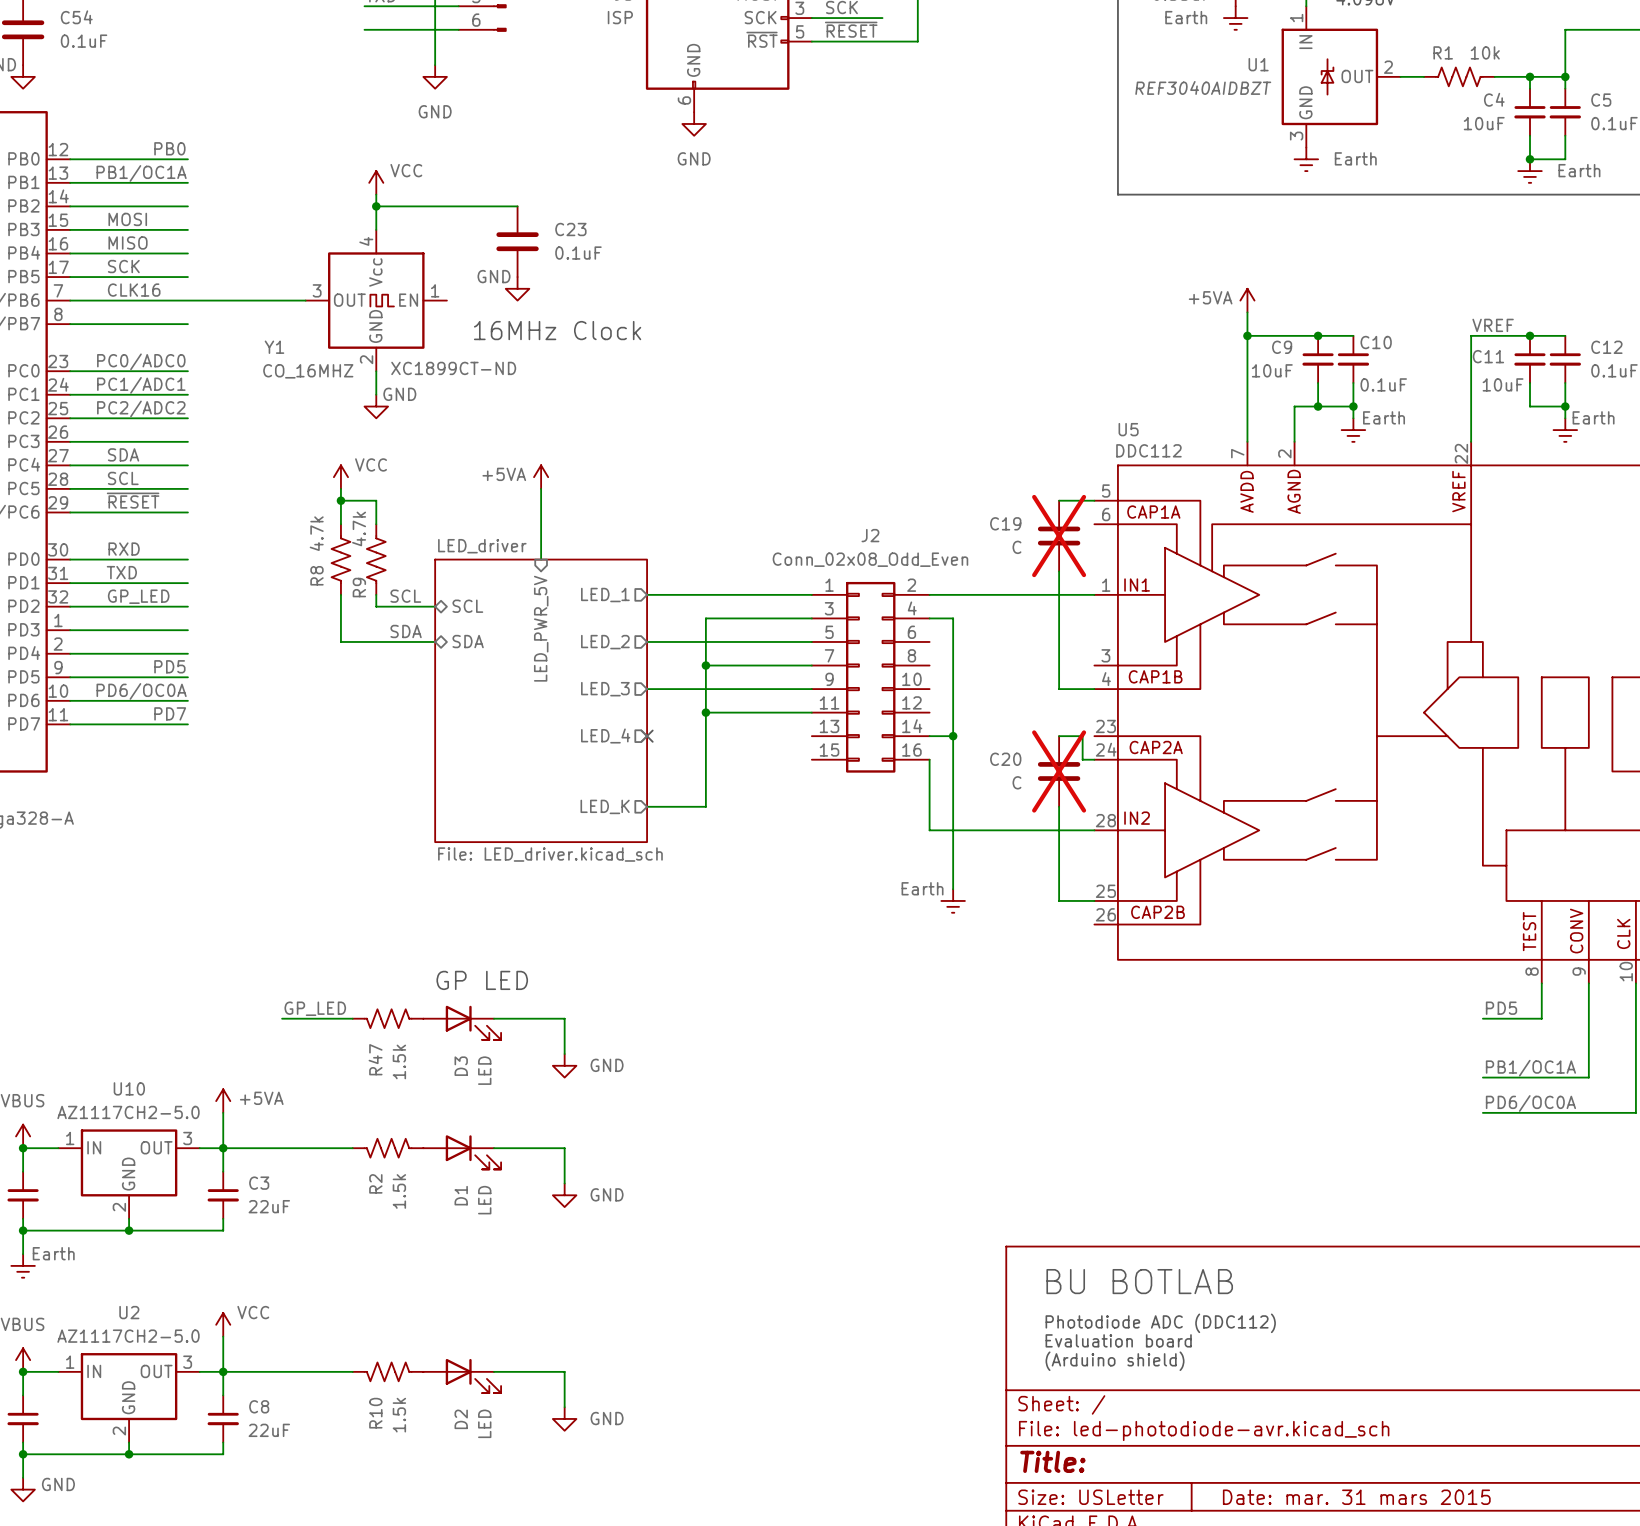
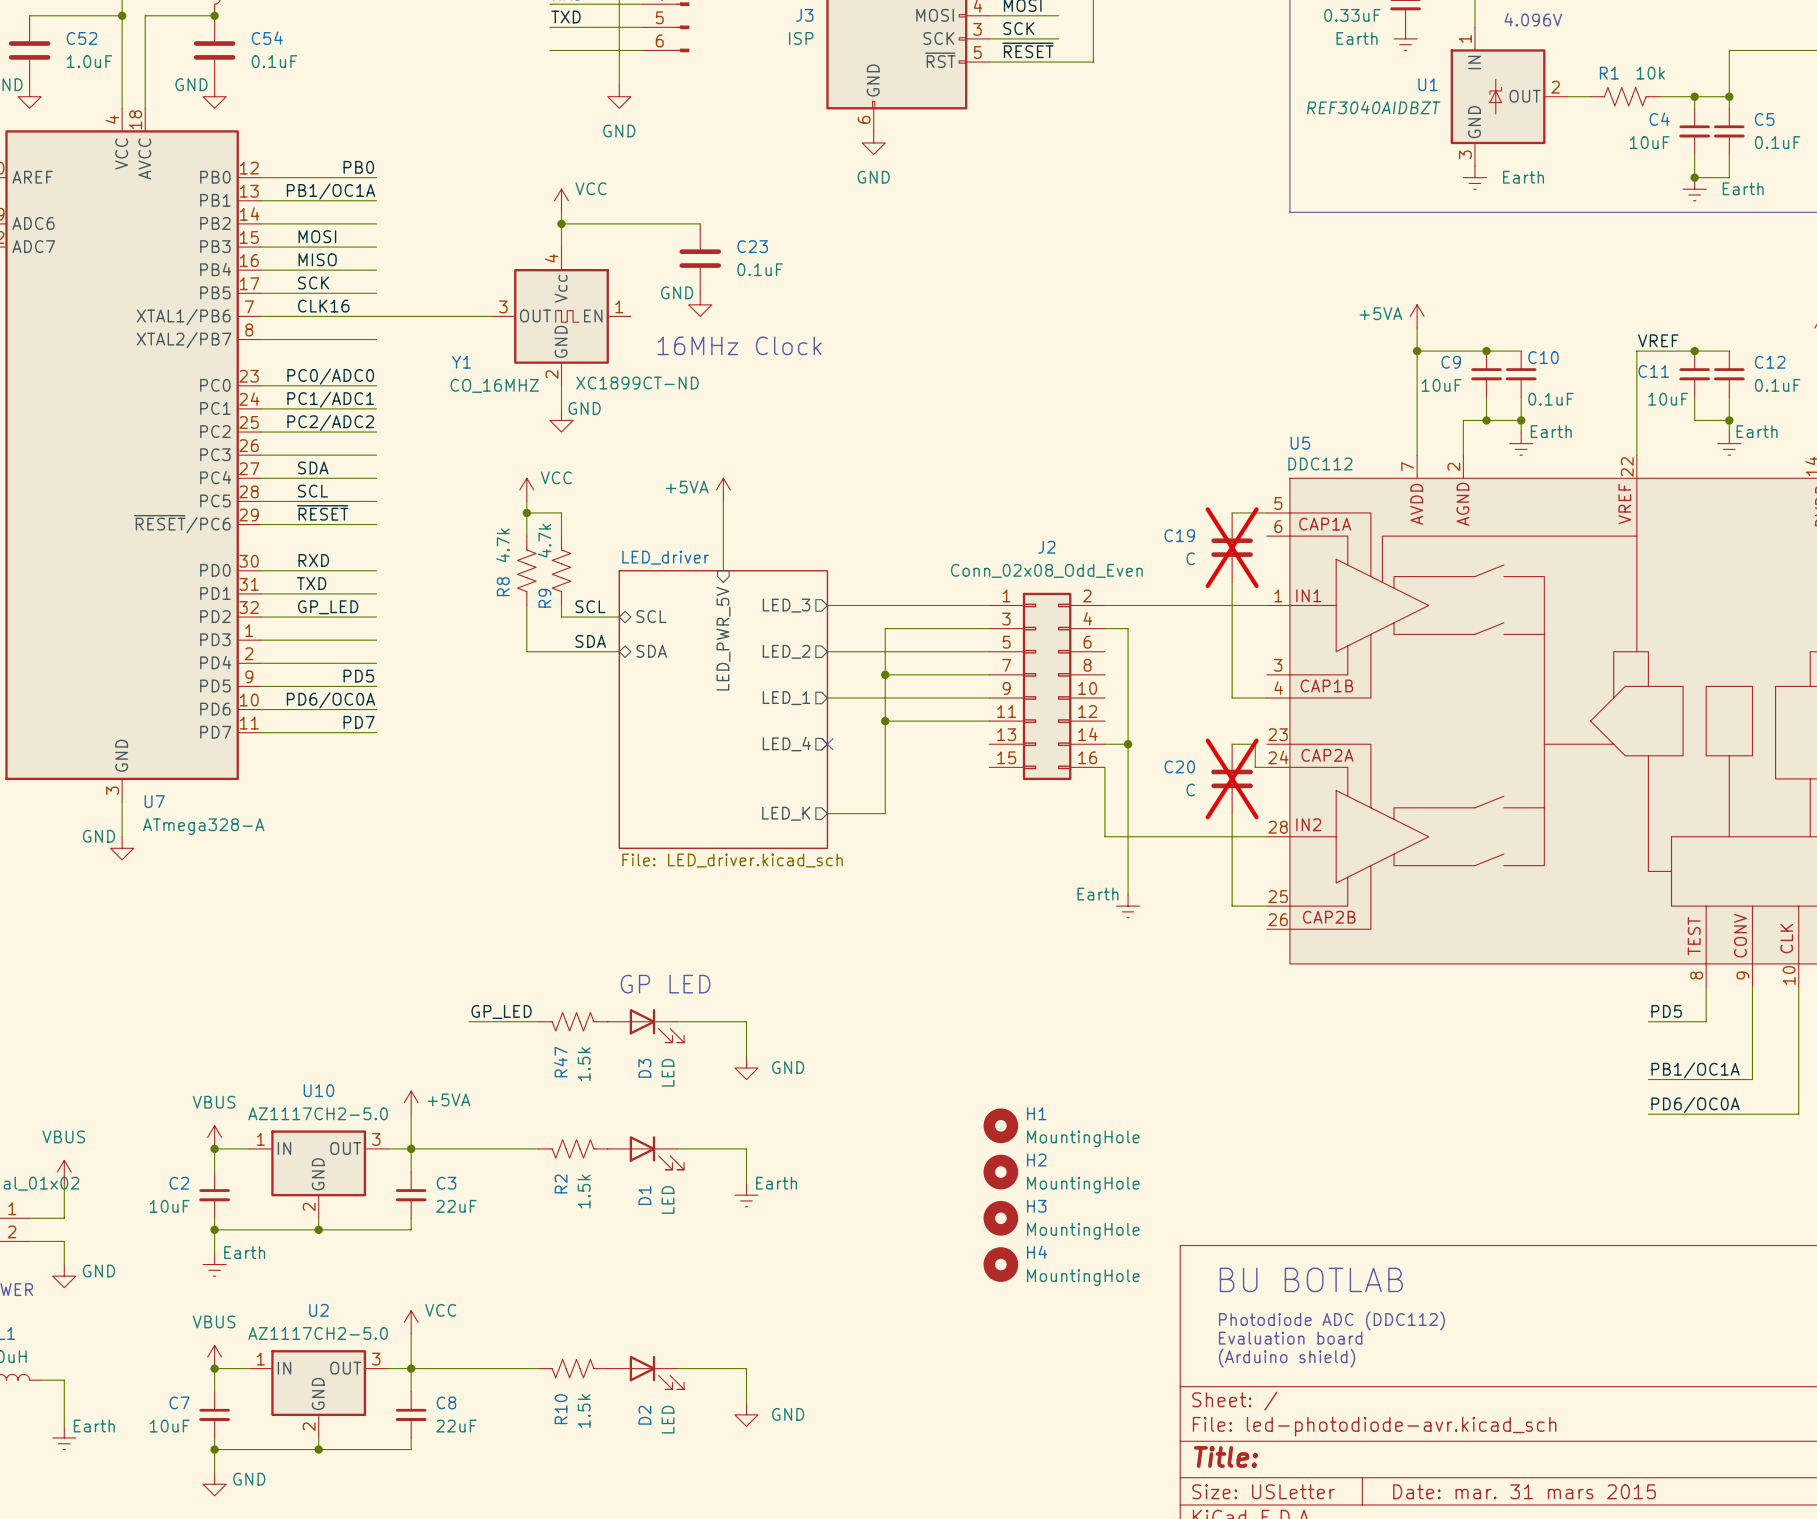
sheet pin: LED_1 (605, 595) -> LED_3 (786, 605)
sheet pin: LED_3 (605, 689) -> LED_1 (786, 698)
H1: none -> MountingHole (1000, 1125)
H2: none -> MountingHole (1000, 1172)
power symbol: GND (564, 1195) -> Earth (746, 1195)
H3: none -> MountingHole (1000, 1218)
H4: none -> MountingHole (1000, 1264)

